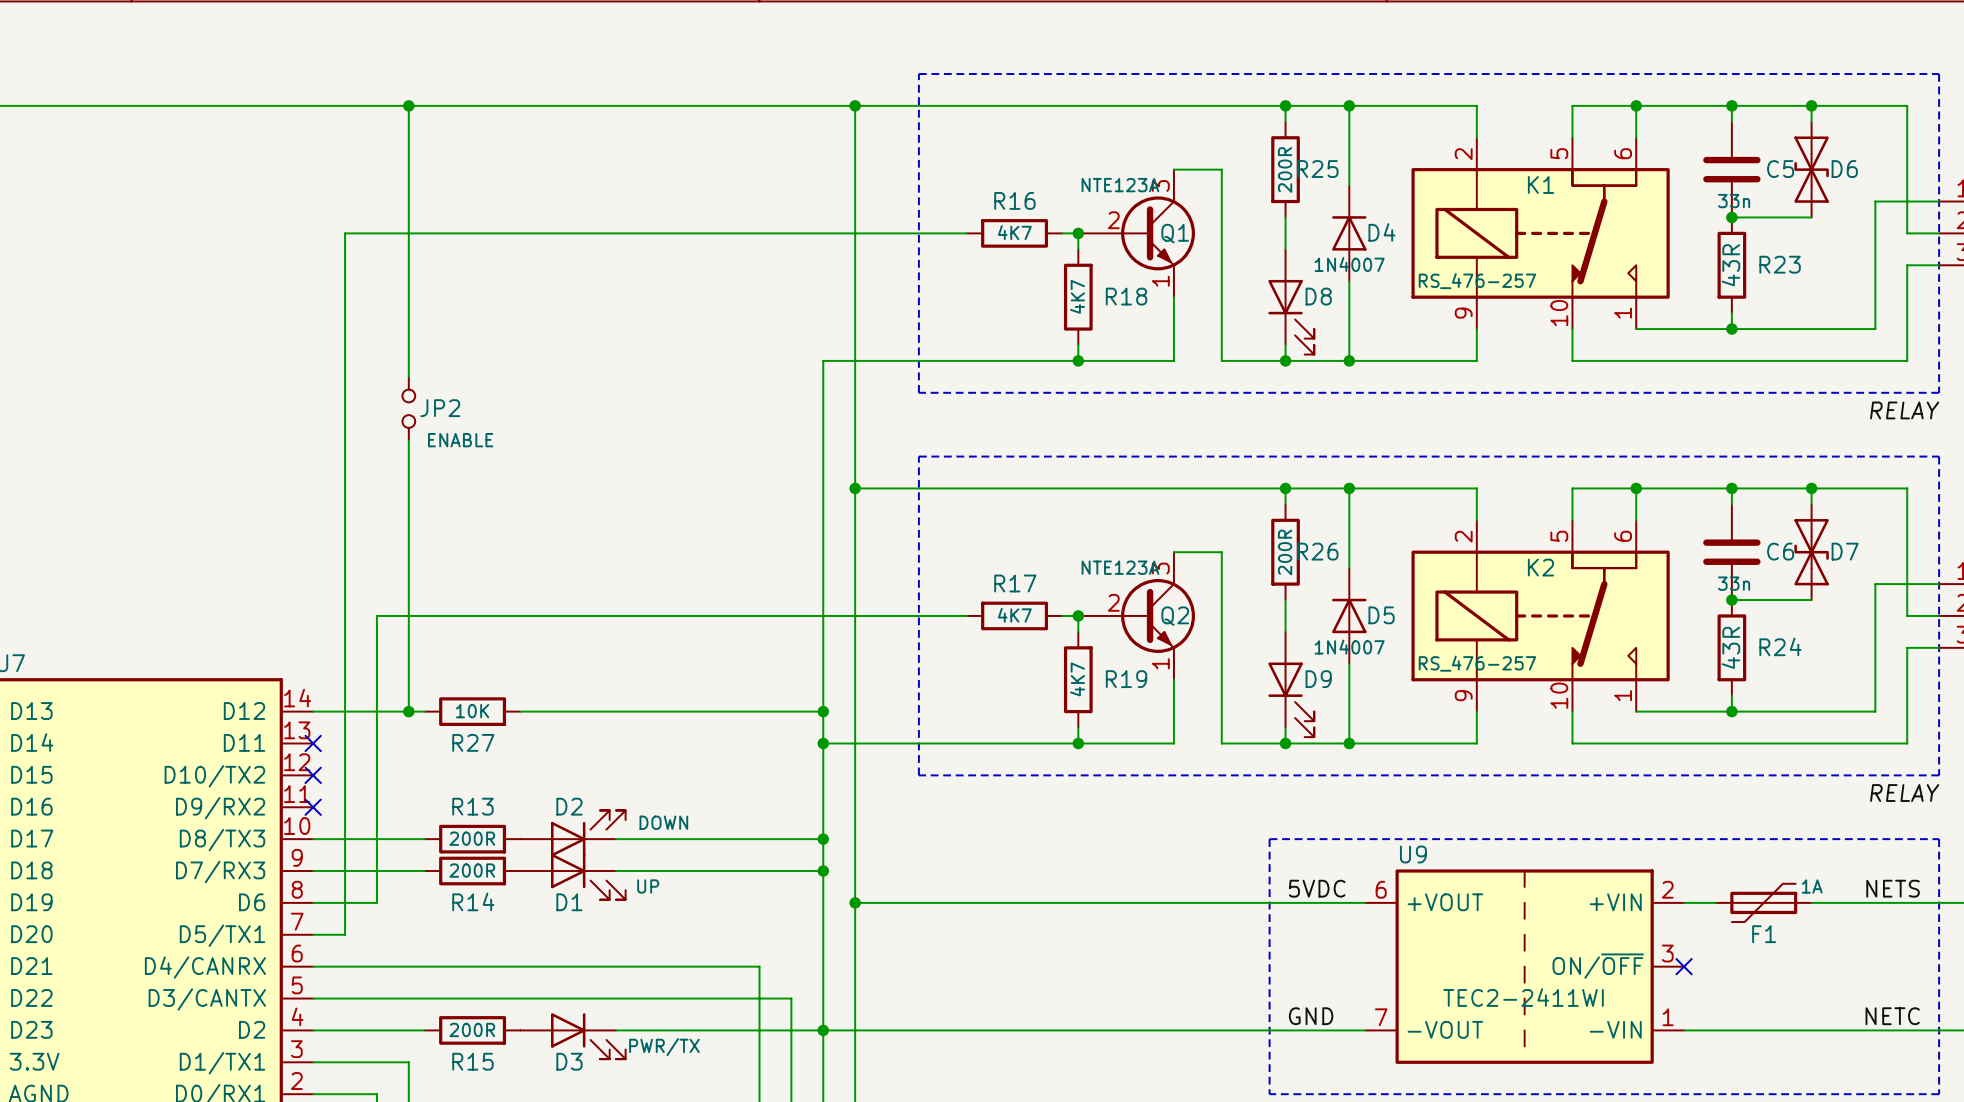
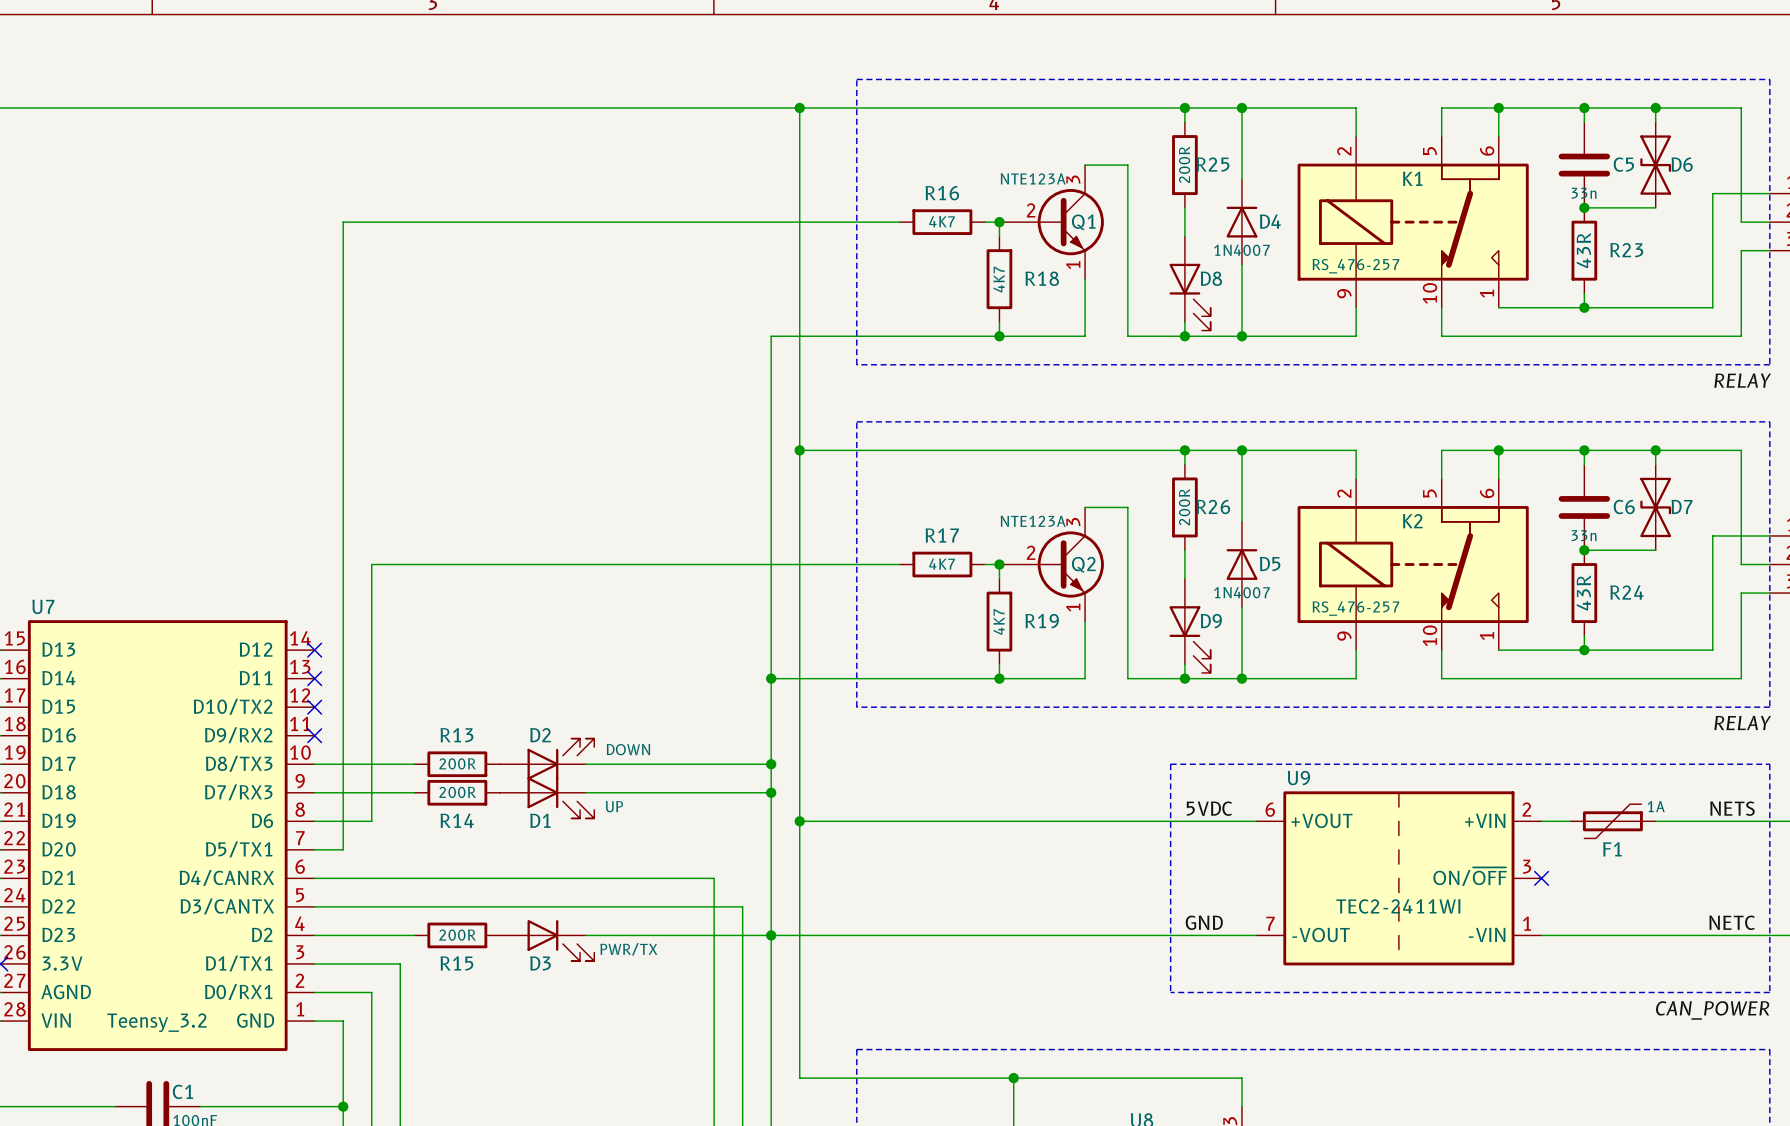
wire: (408, 105) (408, 376) -> none
junction: (408, 105) -> none
JP2: ENABLE (408, 408) -> none
wire: (408, 440) (408, 711) -> none
wire: (313, 711) (424, 711) -> none
no-connect mark: none -> (314, 650)
junction: (408, 711) -> none
R27: 10K (472, 711) -> none
wire: (520, 711) (823, 711) -> none
junction: (823, 711) -> none

